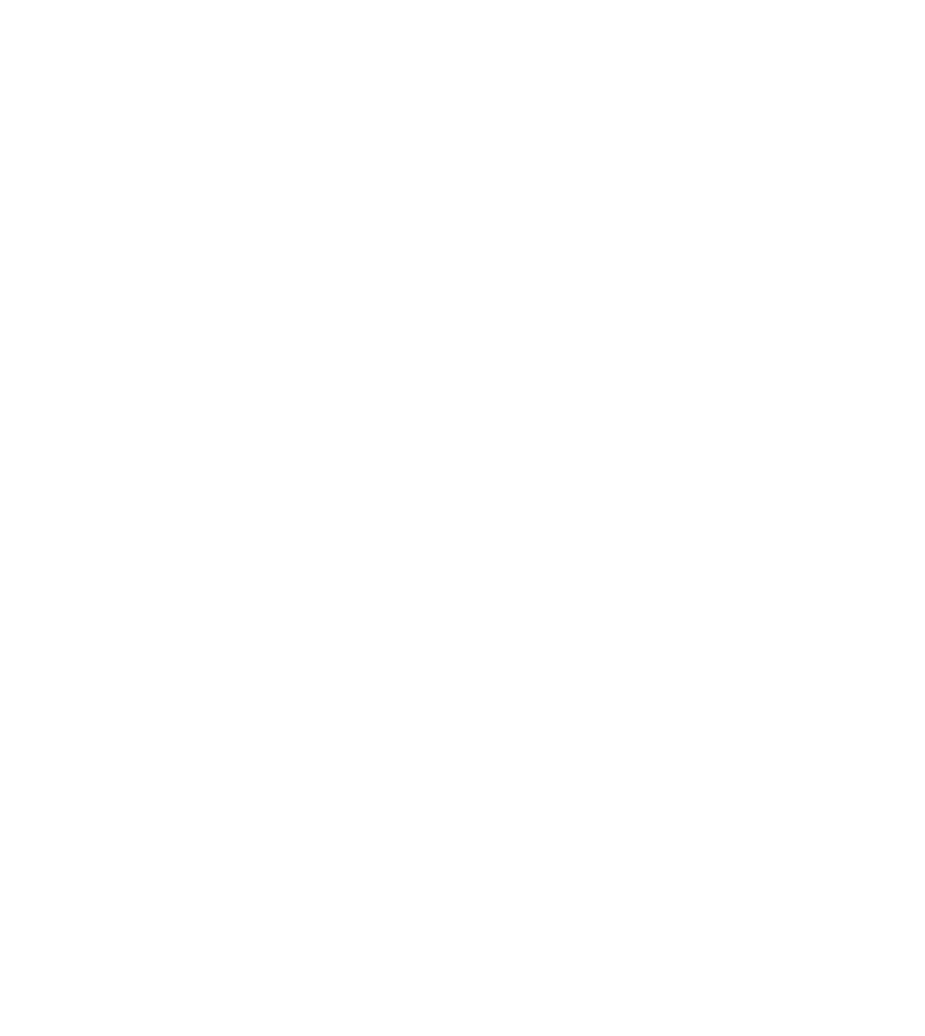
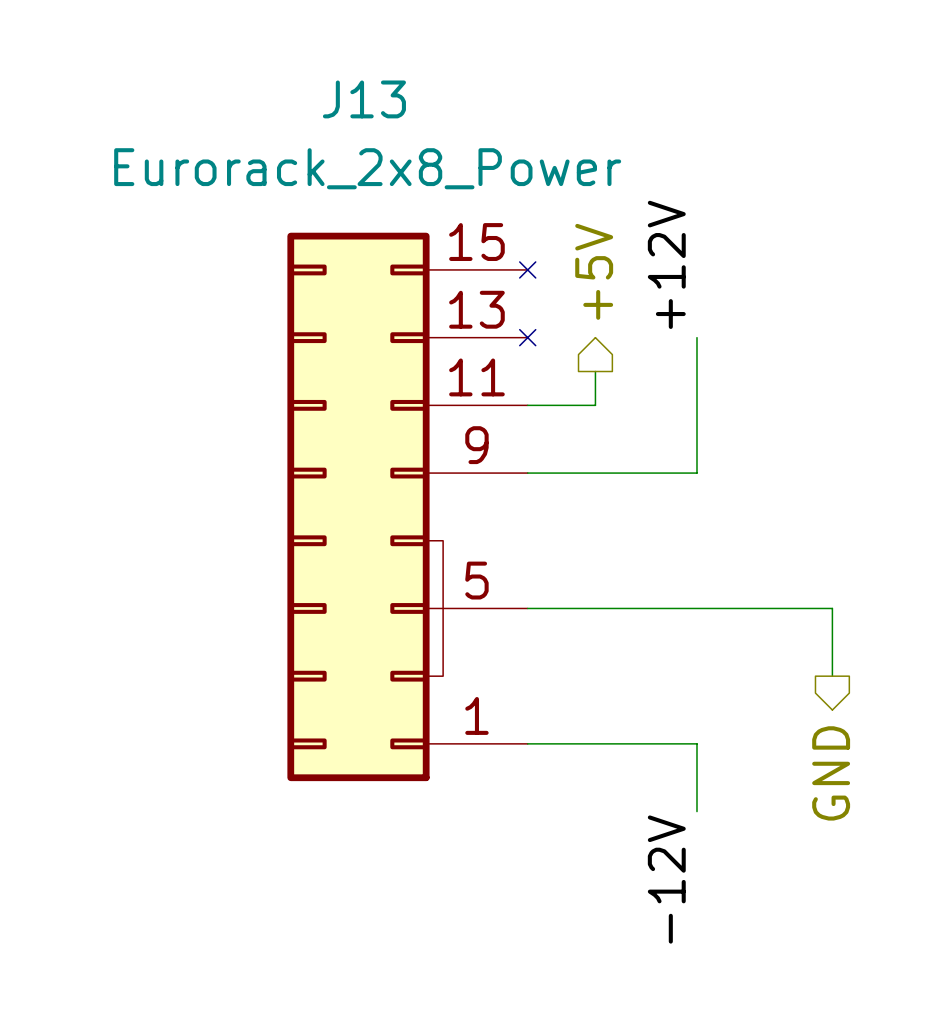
label: none -> +12V (666, 264)
hierarchical label: none -> +5V (594, 271)
wire: none -> (696, 337) (696, 473) (527, 473)
wire: none -> (595, 371) (595, 405) (527, 405)
J13: none -> Eurorack_2x8_Power (411, 506)
wire: none -> (527, 608) (832, 608) (832, 676)
wire: none -> (527, 743) (696, 743) (696, 811)
hierarchical label: none -> GND (831, 773)
label: none -> -12V (666, 879)

